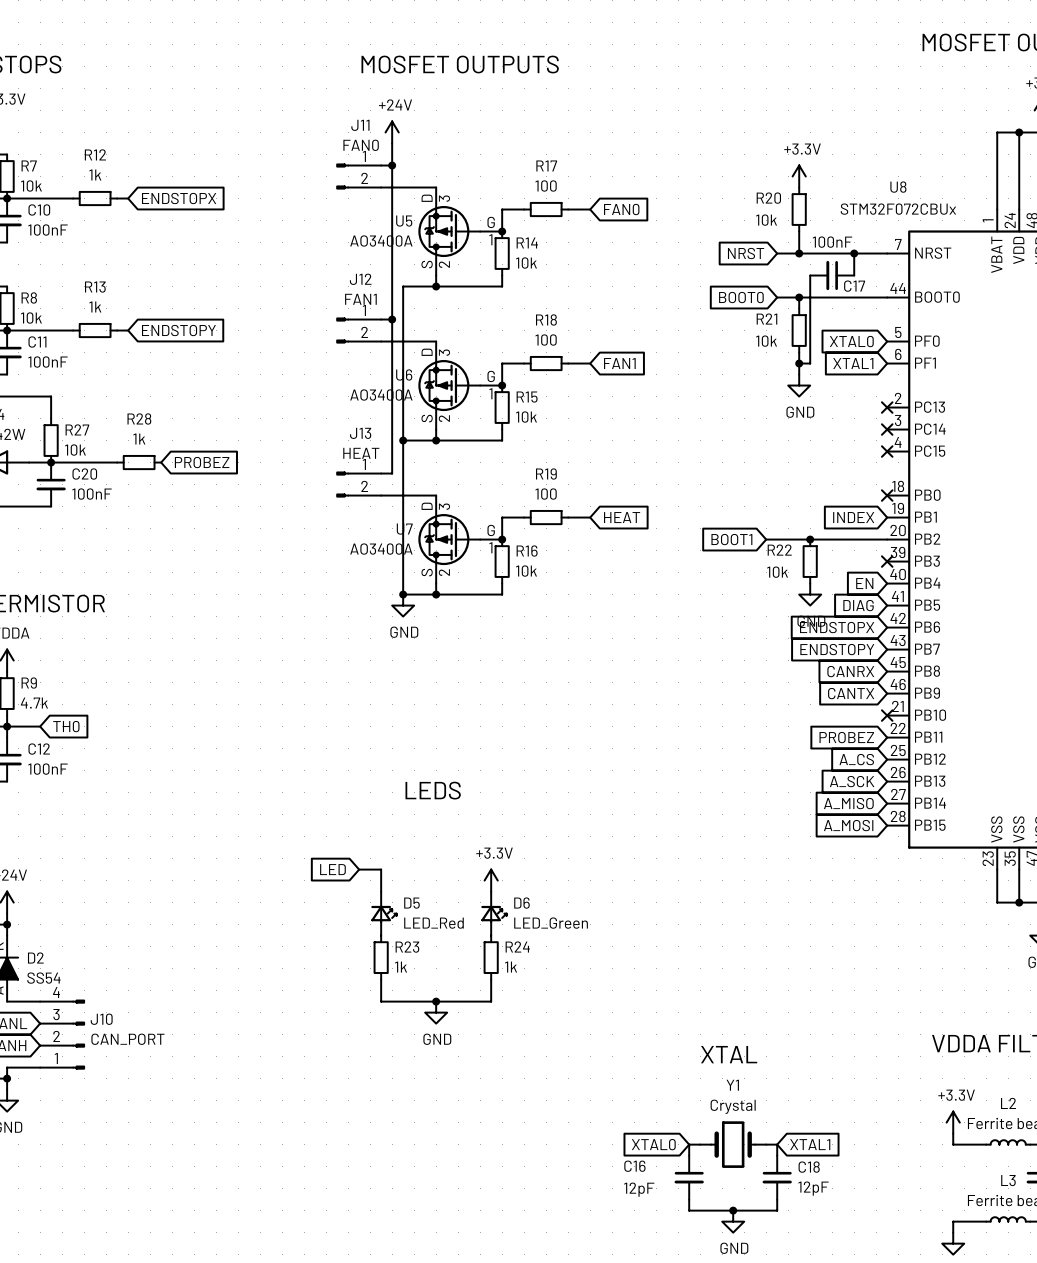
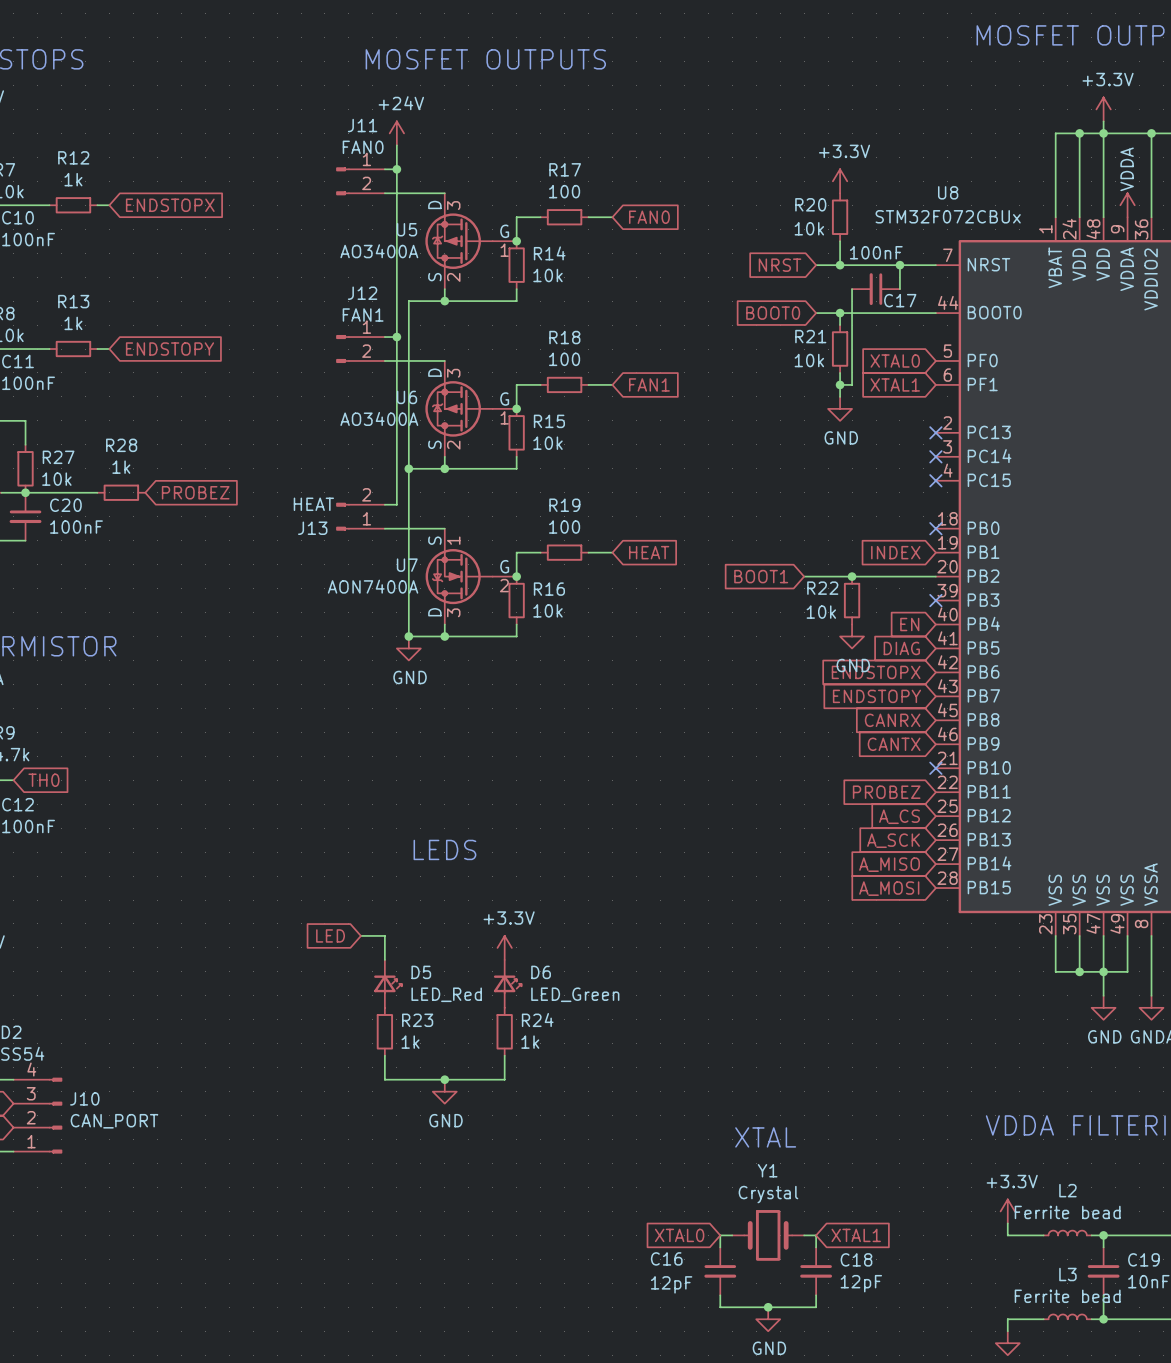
J13 name position: J13 (360, 433) -> J13 (312, 528)
J13 value position: HEAT (361, 453) -> HEAT (313, 504)
J13 flip: as is (342, 484) -> up-down (342, 516)
U7 symbol: [418, 495, 503, 584] -> [425, 528, 517, 625]
U7 value: AO3400A (381, 549) -> AON7400A (373, 586)

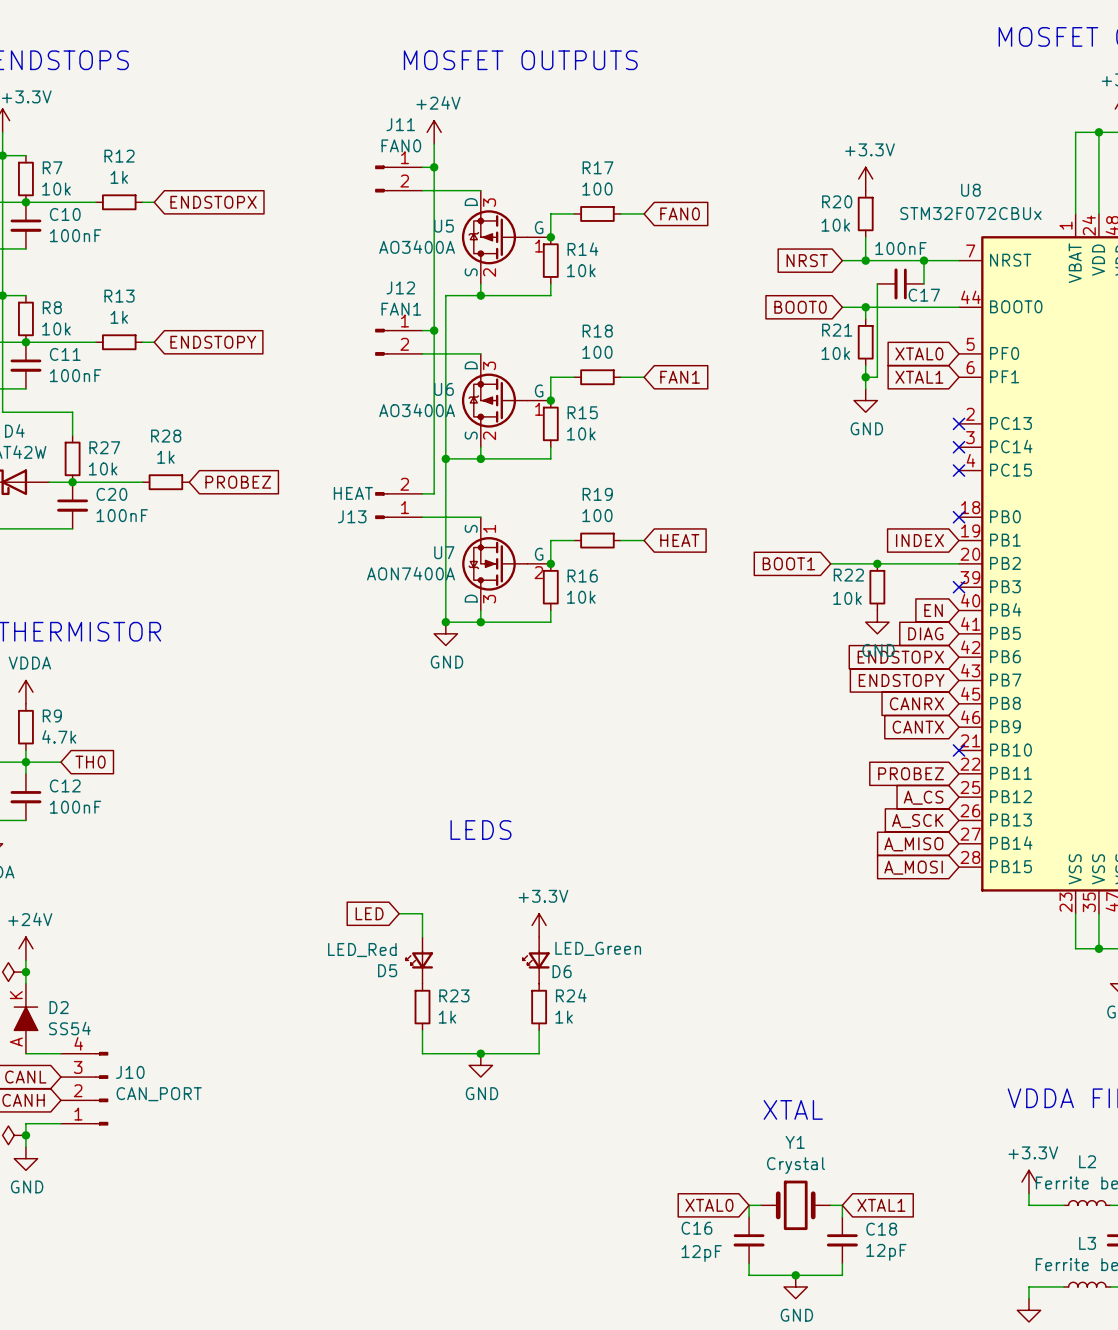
D6 name position: D6 (541, 972) -> D6 (562, 971)
D5 rotation: 0° (387, 984) -> 180° (419, 959)
D6 rotation: 0° (507, 984) -> 180° (536, 959)
D6 value position: LED_Green (575, 994) -> LED_Green (598, 948)

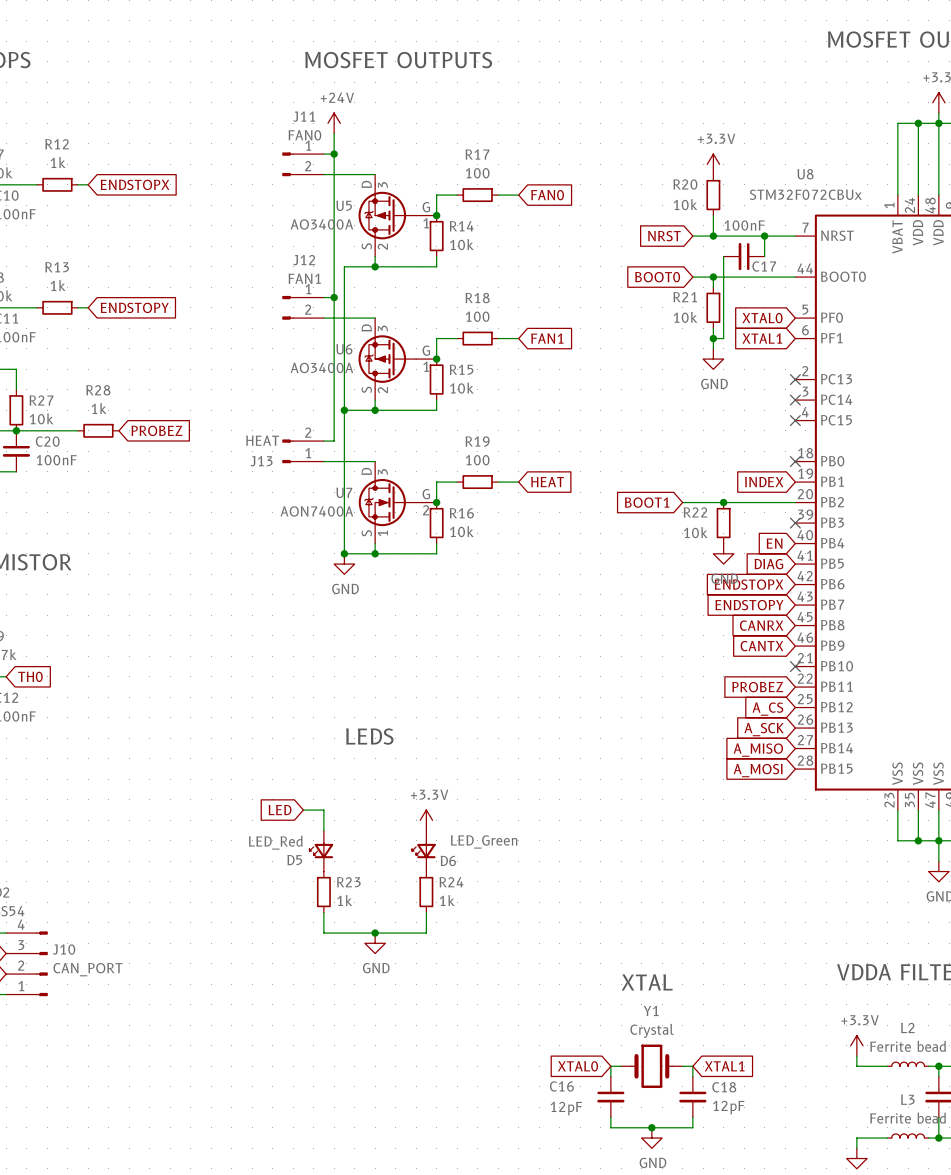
U7 flip: as is (494, 563) -> up-down (387, 502)

